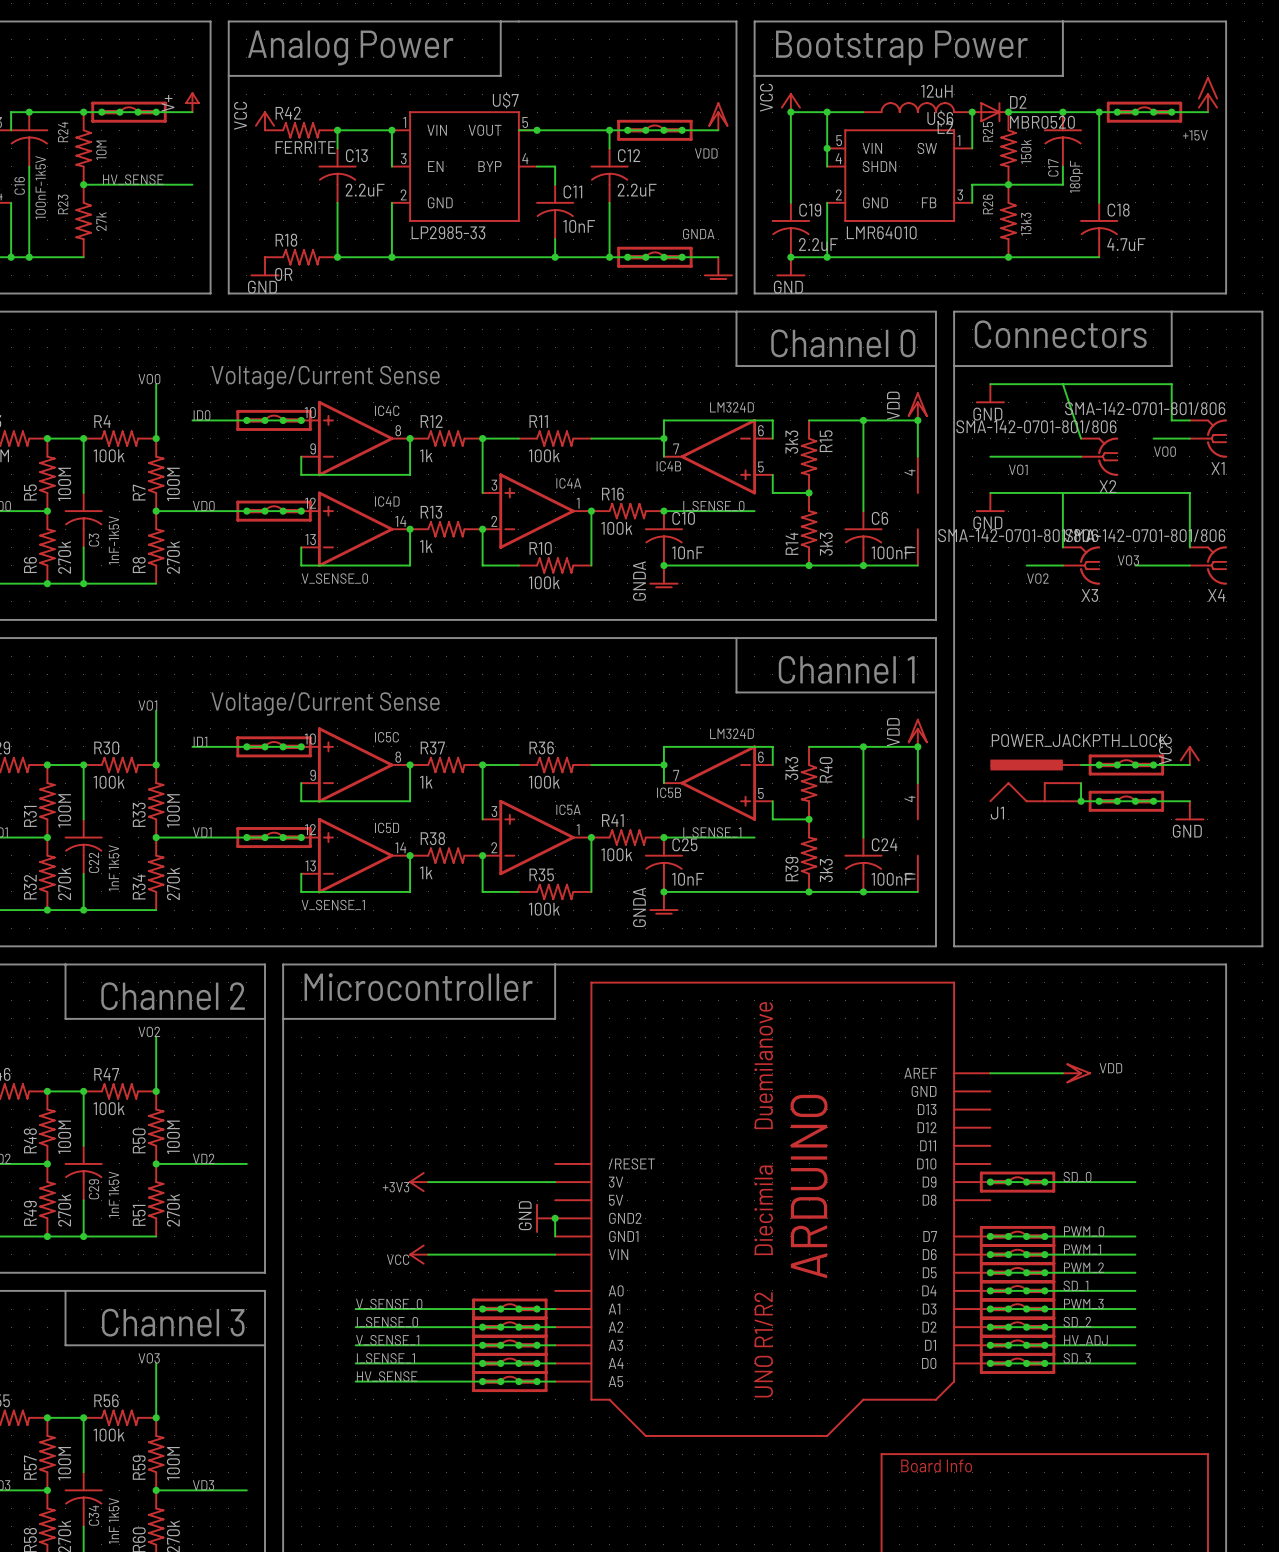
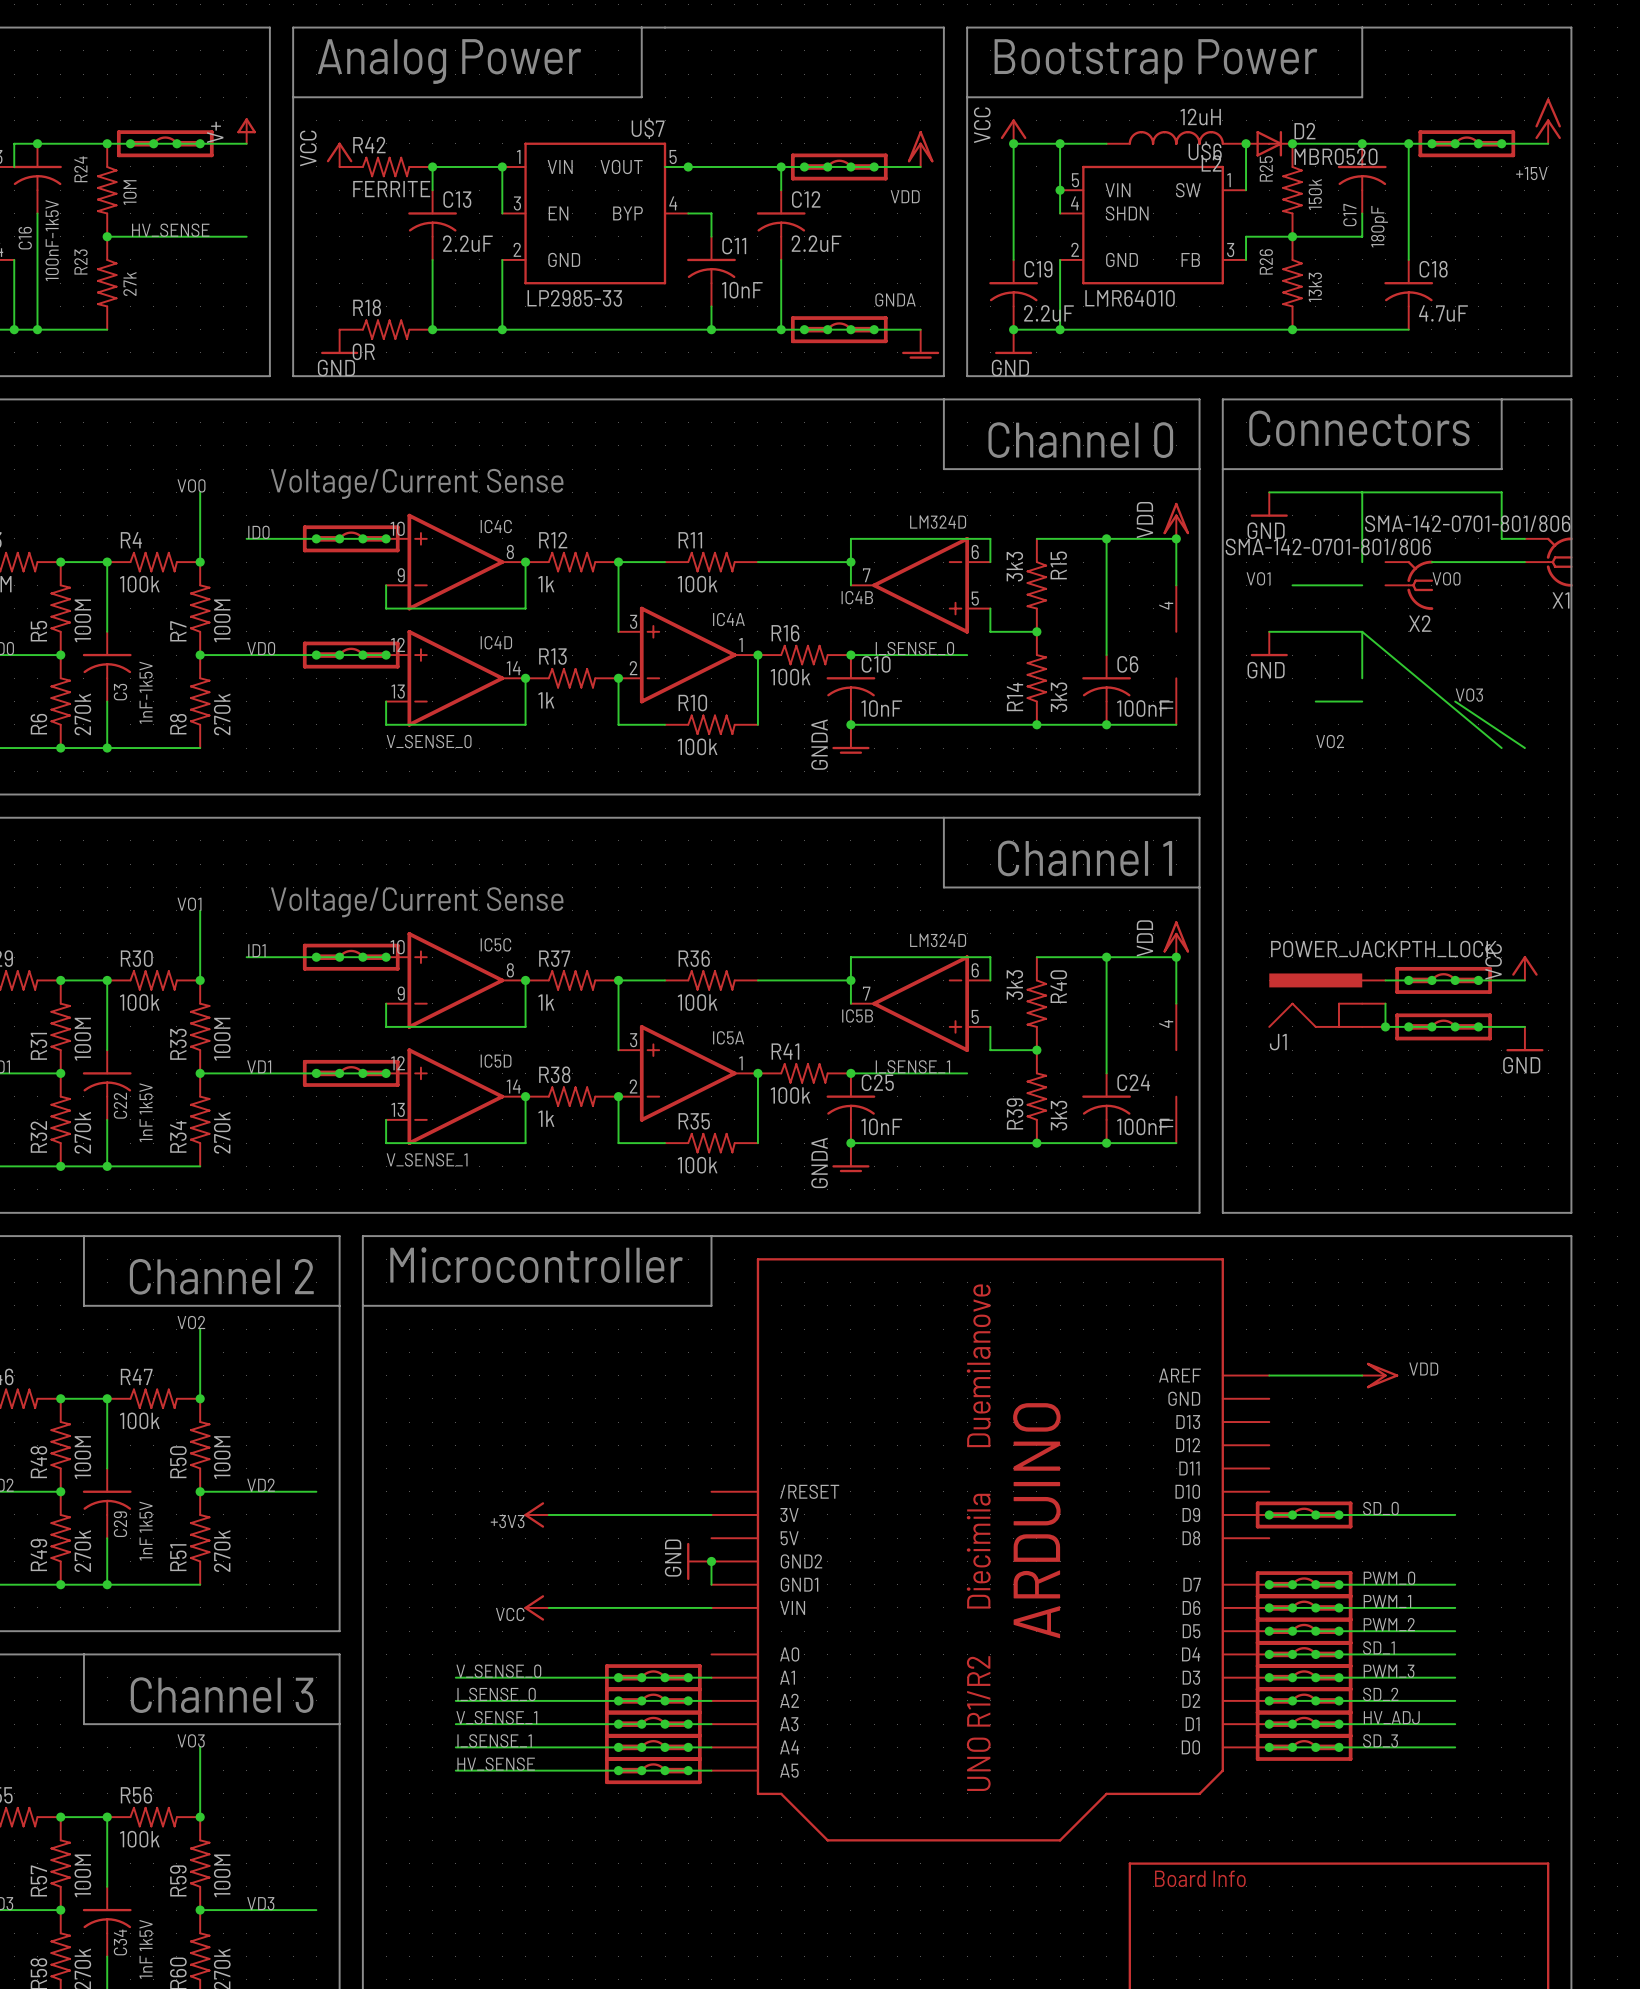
bus: (1226, 311) (1262, 311) (1262, 946) (1226, 946) -> (1571, 399) (1571, 1212)
wire: (1062, 384) (1081, 438) -> (1362, 492) (1362, 562)
label position: VO0 (1164, 451) -> VO0 (1446, 578)
wire: (990, 456) (1008, 456) -> none
wire: (1062, 456) (1081, 456) -> none
label position: VO1 (1018, 469) -> VO1 (1258, 578)
wire: (1062, 492) (1189, 492) (1189, 547) -> (1362, 631) (1501, 748)
wire: (1062, 529) (1062, 547) -> (1315, 701) (1362, 701)
wire: none -> (1455, 701) (1524, 748)
label position: VO3 (1128, 560) -> VO3 (1469, 695)
wire: (1026, 565) (1062, 565) -> (1431, 562) (1478, 562)
X3: SMA-142-0701-801/806 (1081, 565) -> none
wire: (1135, 565) (1189, 565) -> none
X4: SMA-142-0701-801/806 (1208, 565) -> none

